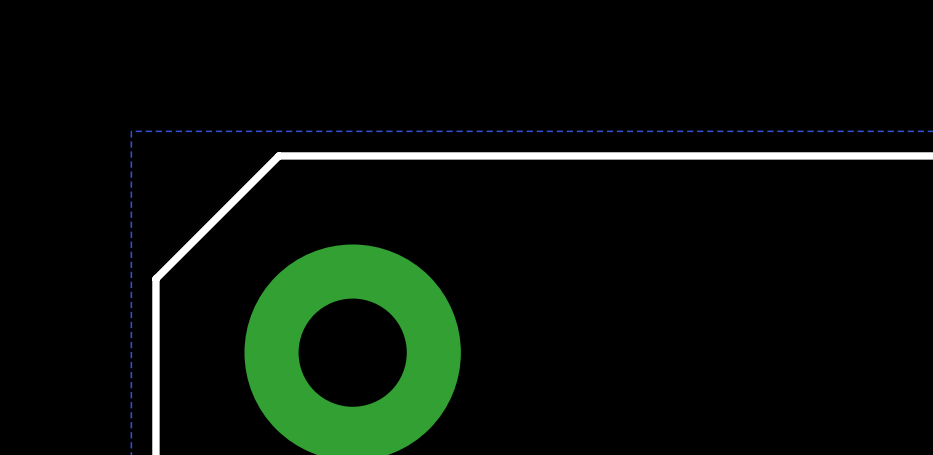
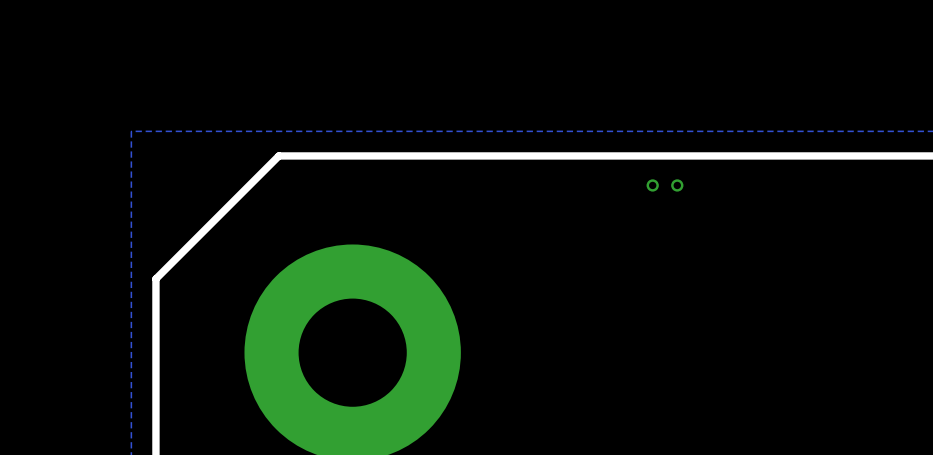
via: none -> (652, 185)
via: none -> (677, 185)

